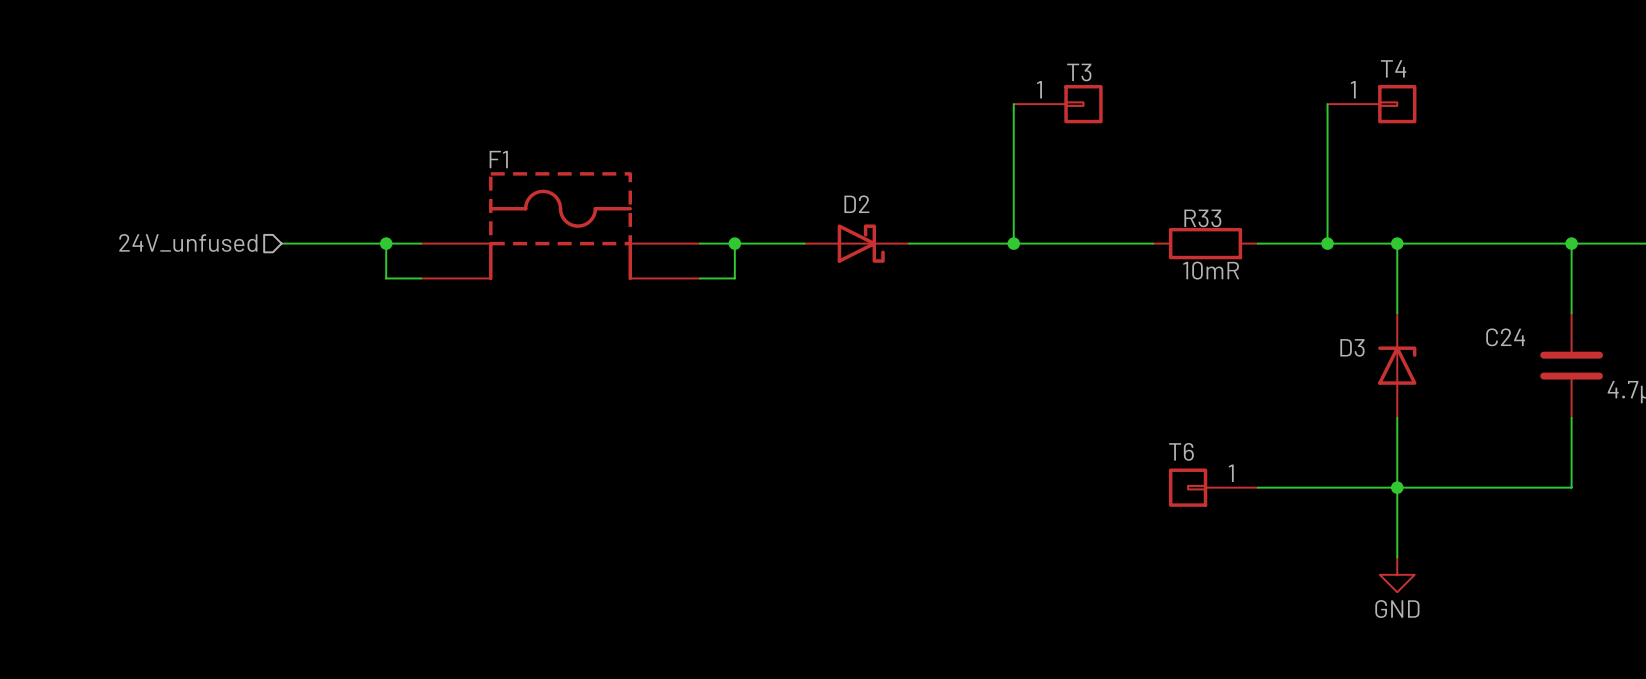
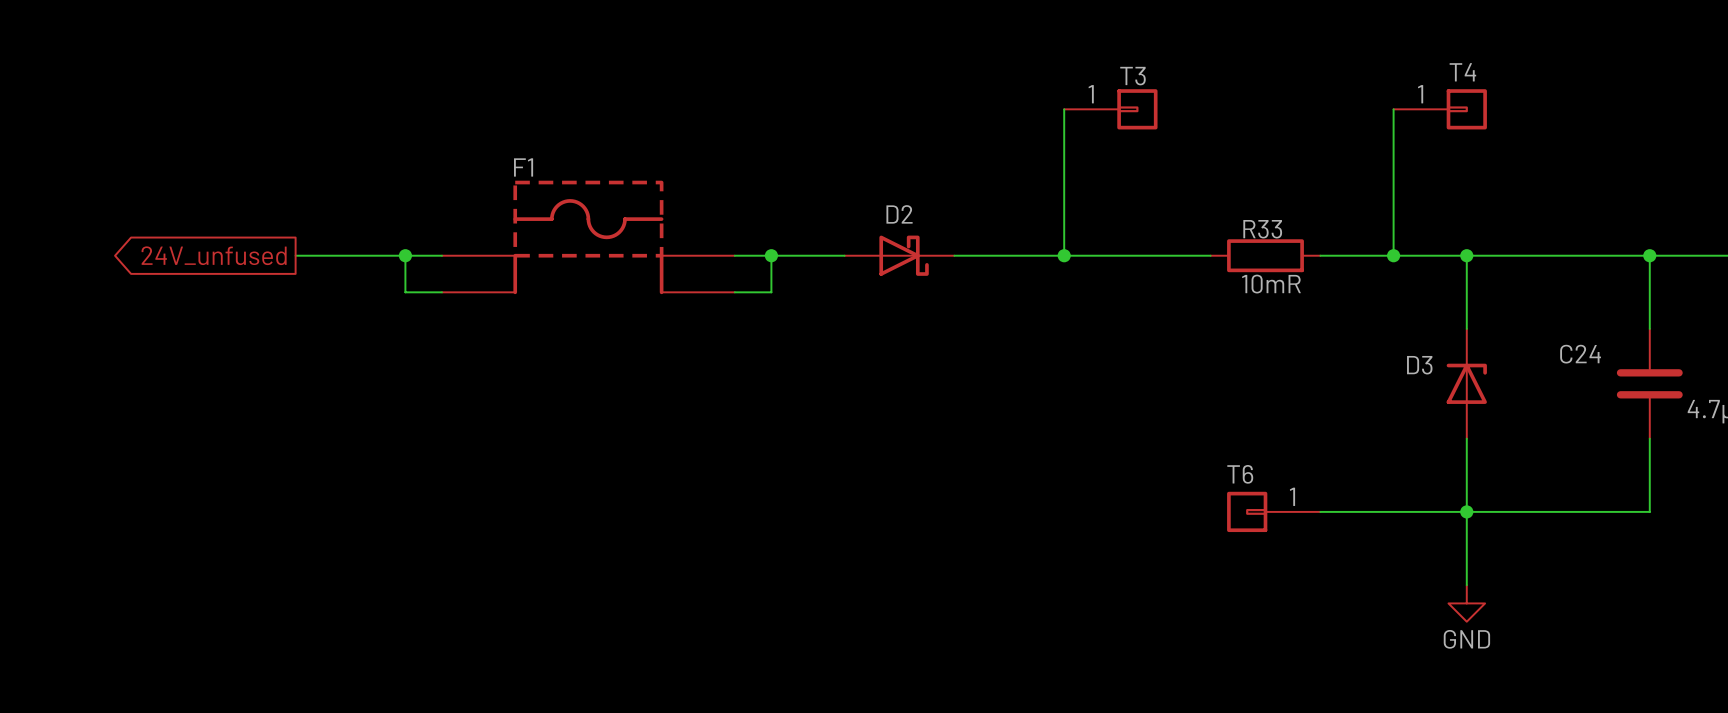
hierarchical label: 24V_unfused (188, 242) -> none
global label: none -> 24V_unfused (214, 255)

